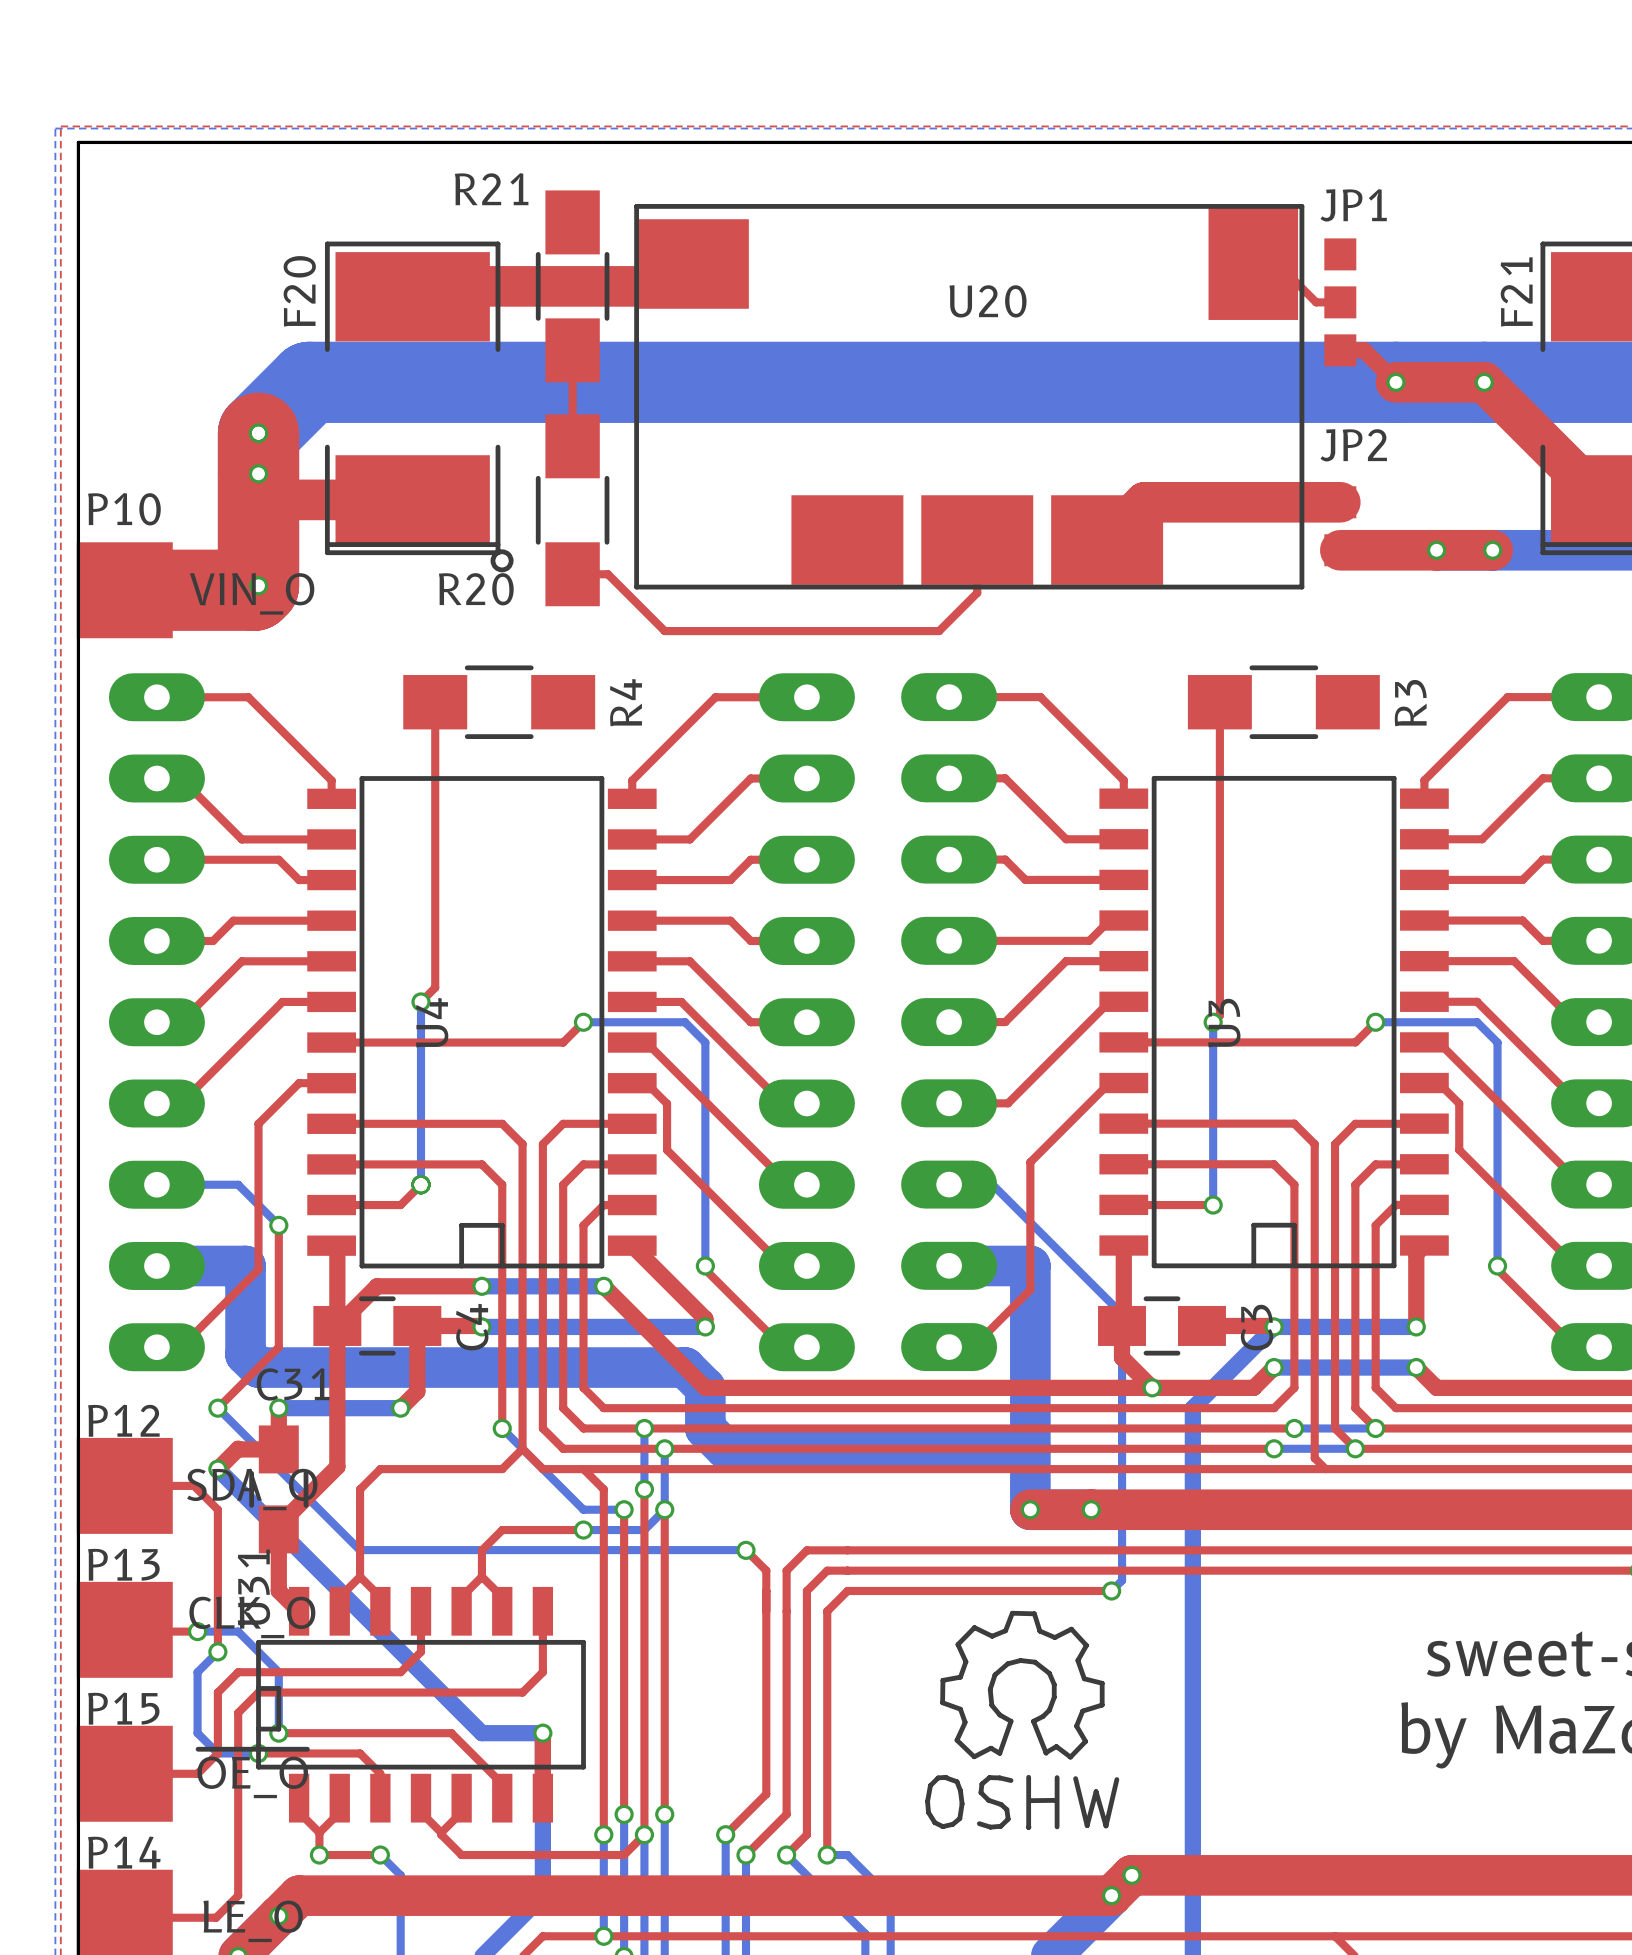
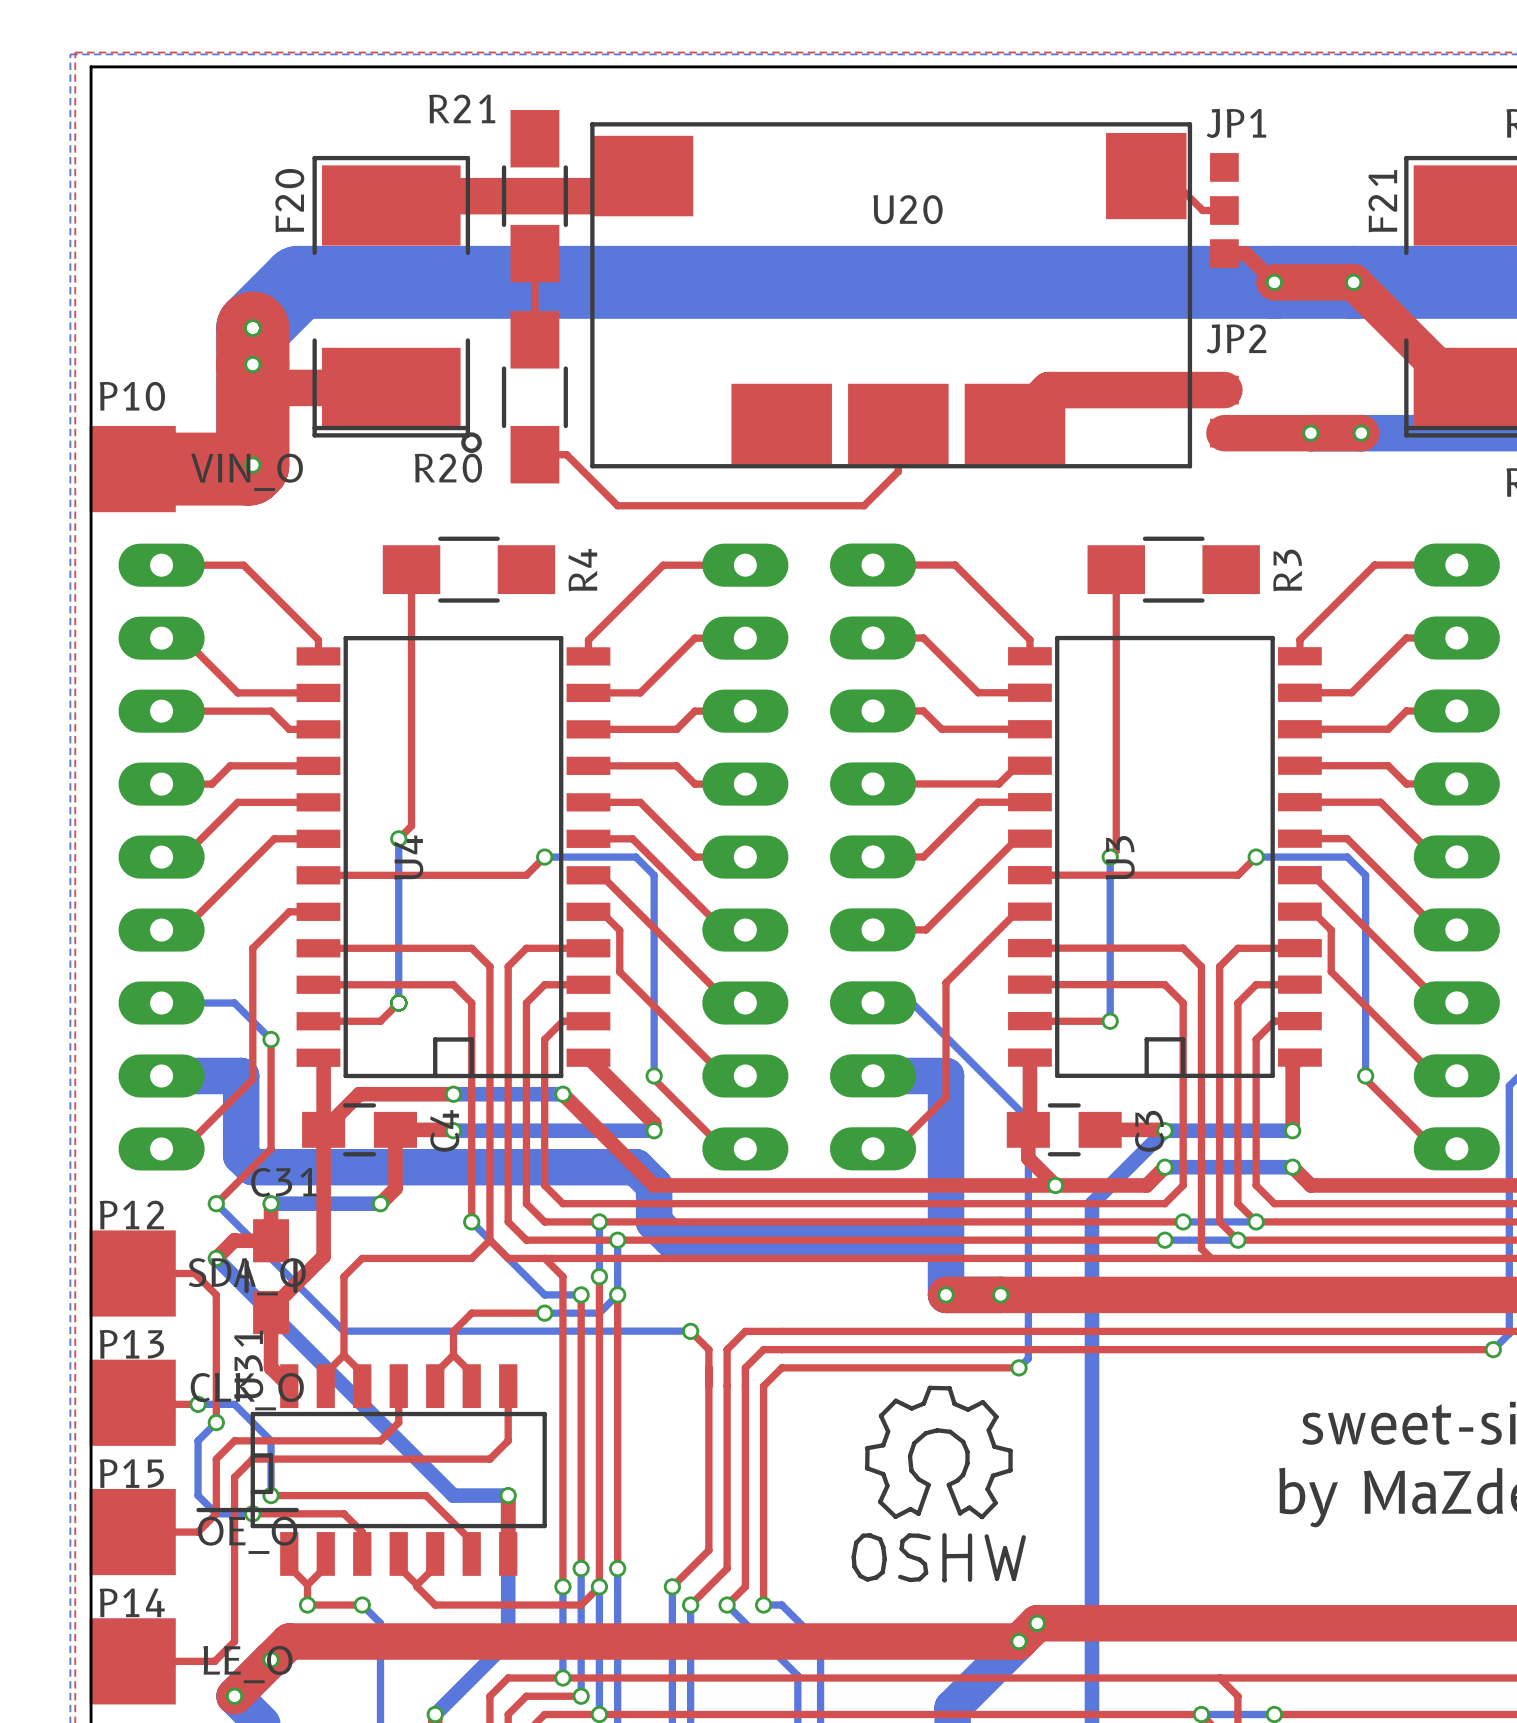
U20 footprint: [634, 204, 1305, 590] -> [590, 122, 1193, 469]

